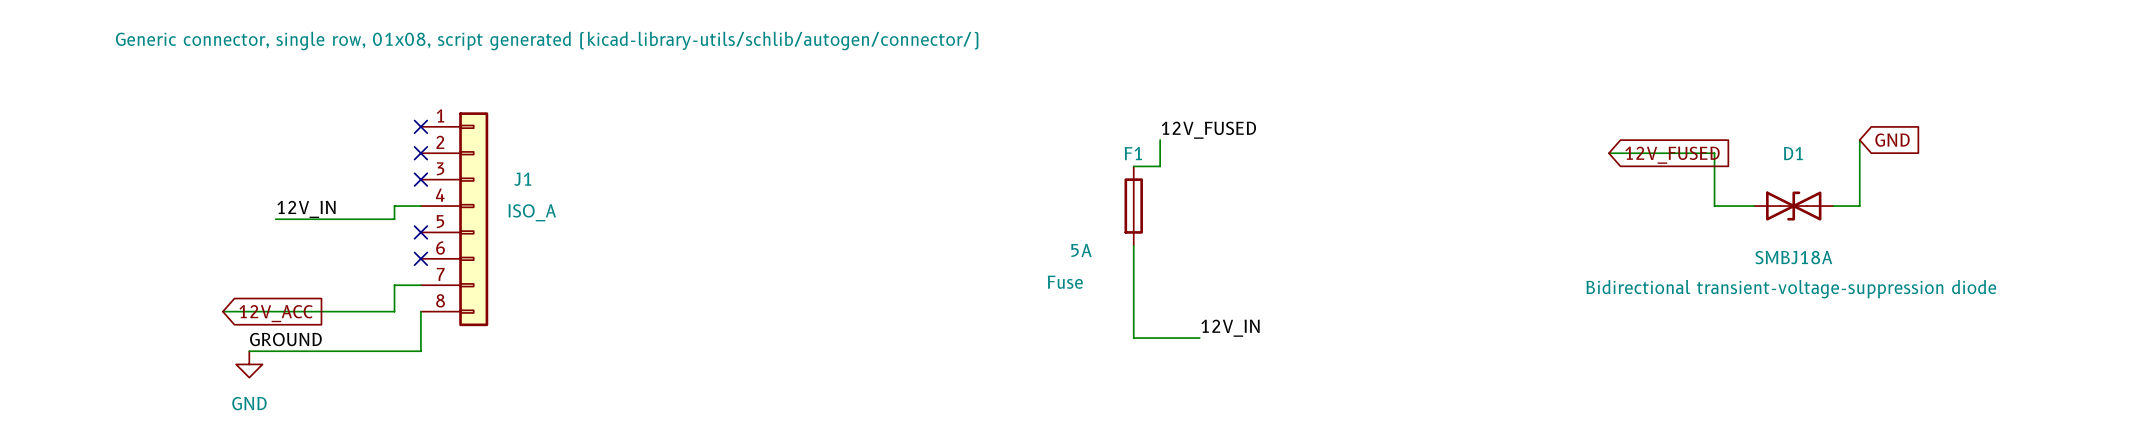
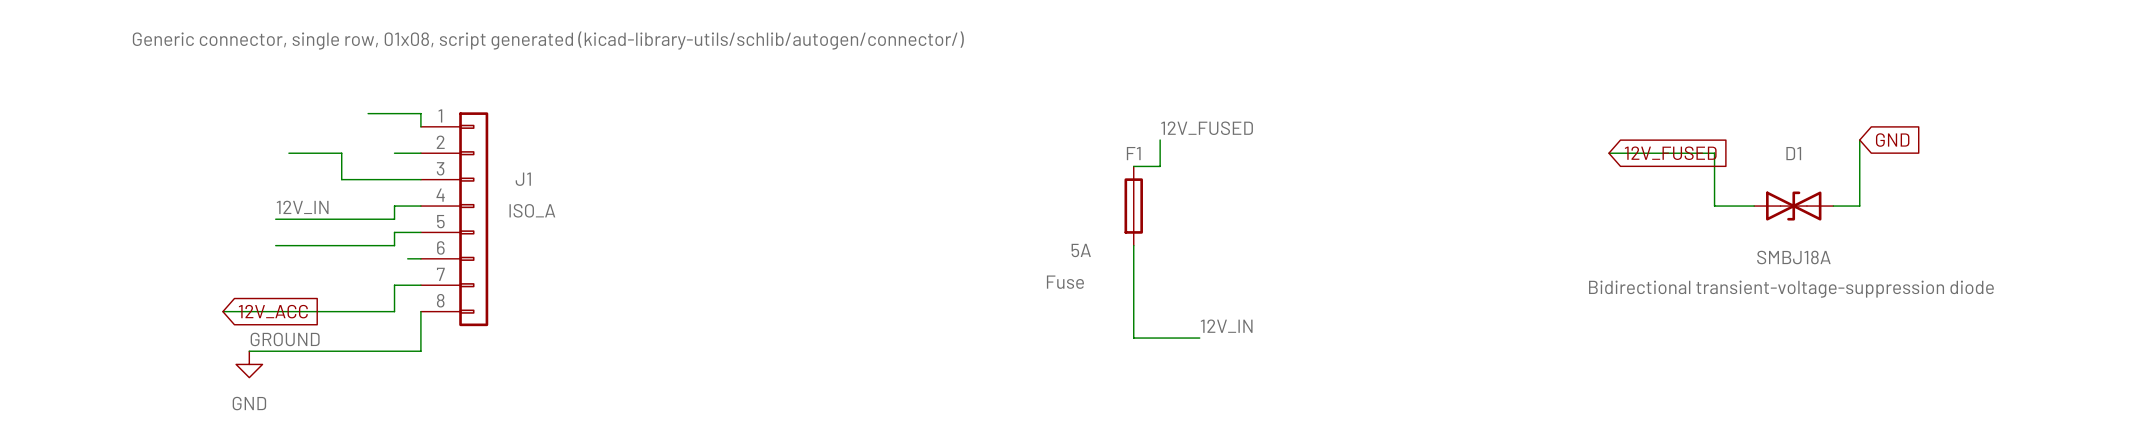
wire: none -> (368, 113) (420, 113) (420, 126)
no-connect mark: (420, 126) -> none
wire: none -> (288, 153) (341, 153) (341, 179) (420, 179)
wire: none -> (394, 153) (420, 153)
no-connect mark: (420, 153) -> none
no-connect mark: (420, 179) -> none
wire: none -> (420, 232) (394, 232) (394, 245) (275, 245)
no-connect mark: (420, 232) -> none
wire: none -> (407, 258) (420, 258)
no-connect mark: (420, 258) -> none

